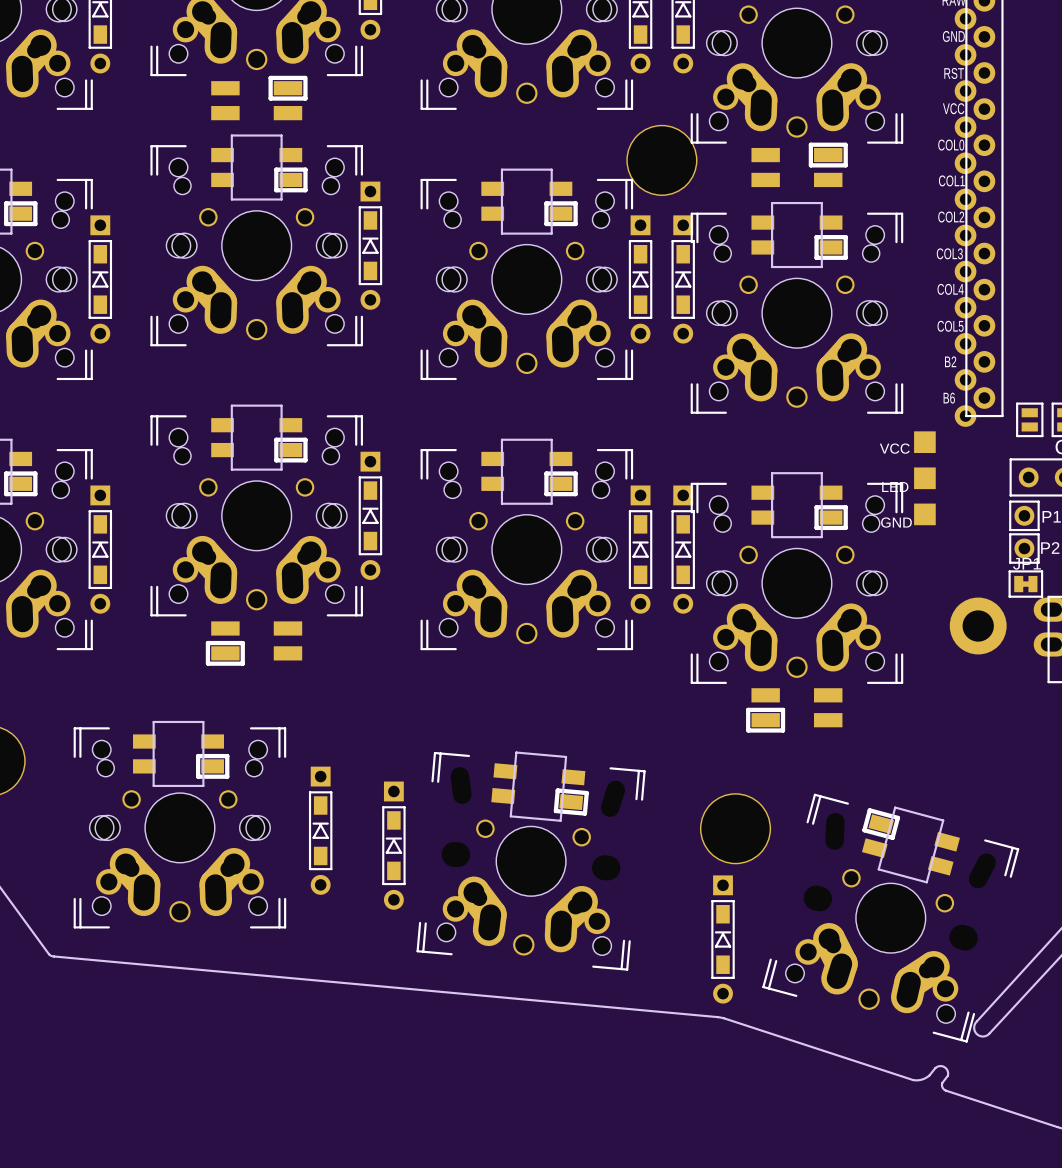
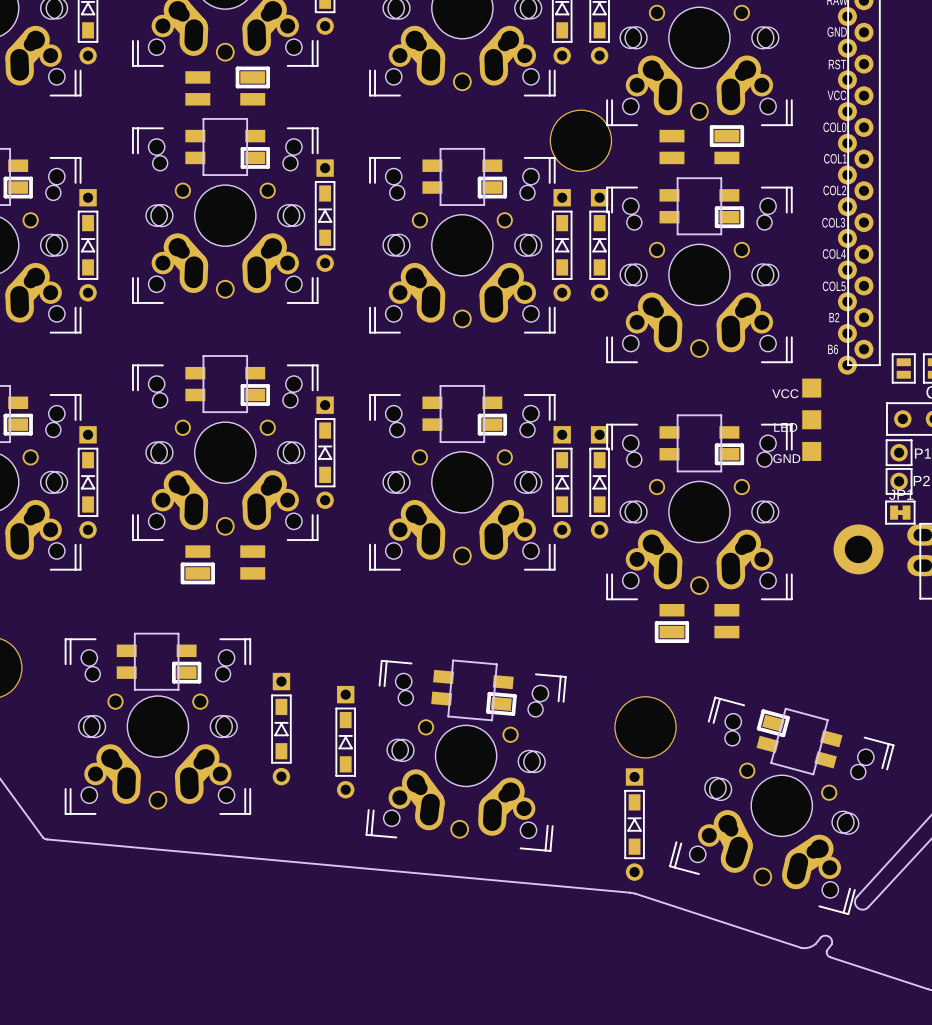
part footprint: [416, 751, 646, 971] -> [365, 659, 567, 852]
part footprint: [762, 793, 1020, 1043] -> [669, 696, 895, 916]

